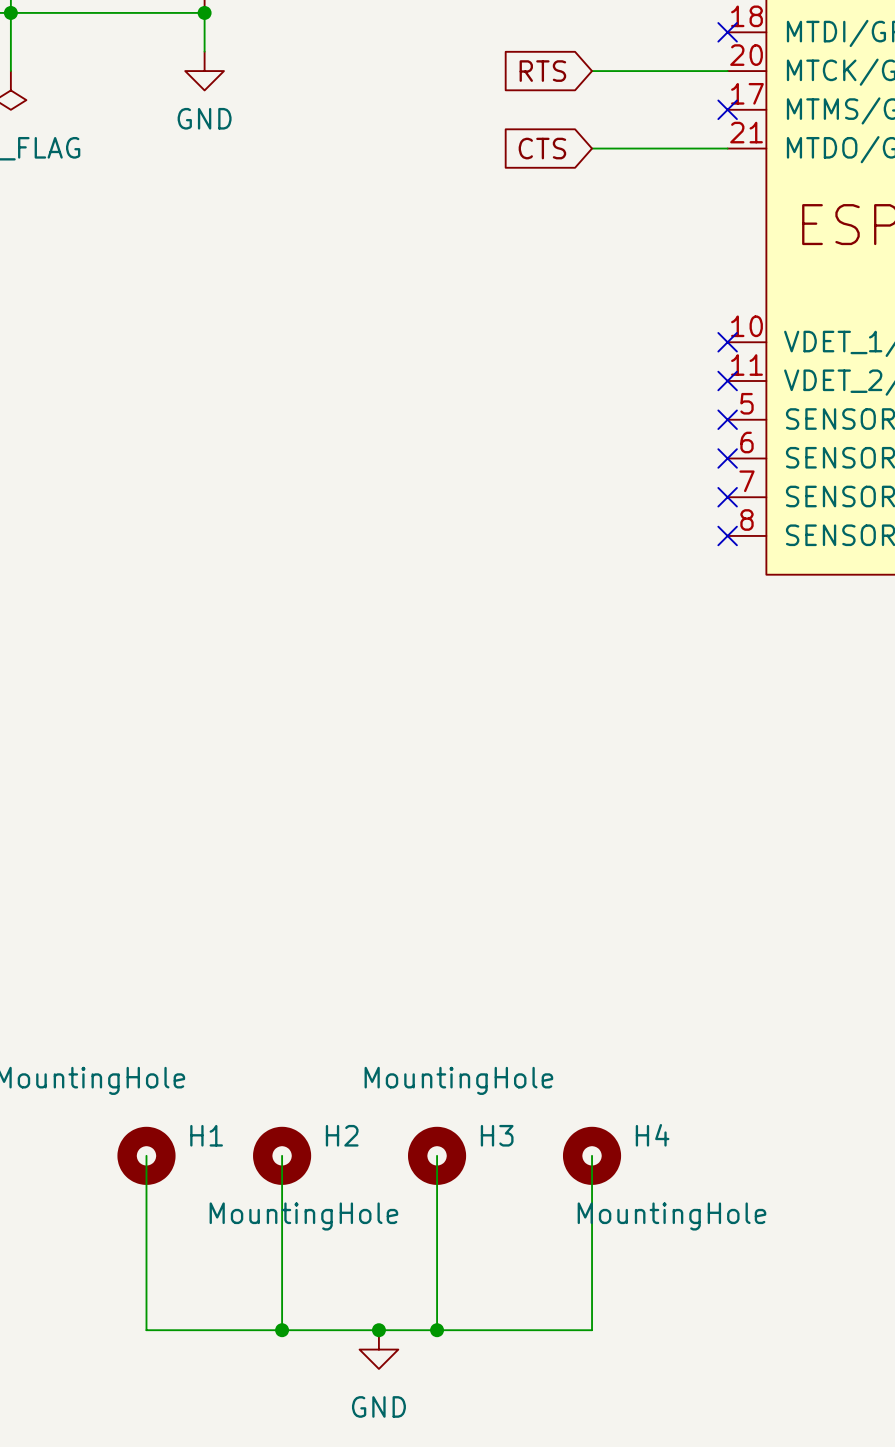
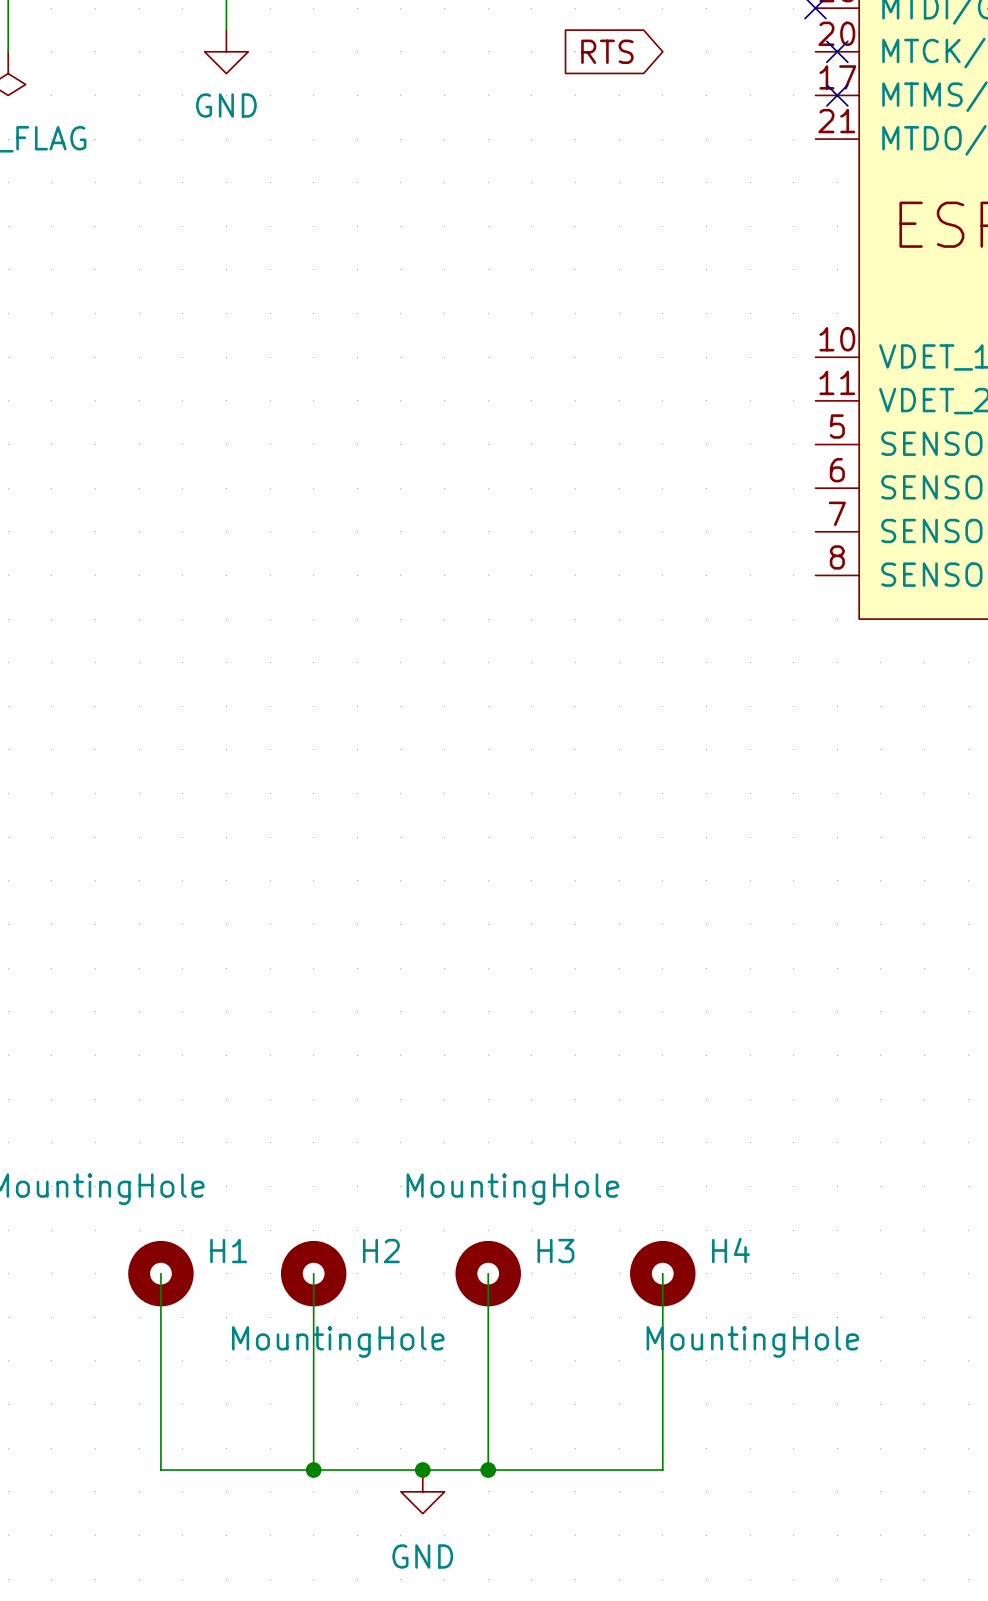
wire: (592, 71) (727, 71) -> none
no-connect mark: none -> (837, 51)
no-connect mark position: (727, 109) -> (837, 95)
global label: CTS (542, 148) -> none
wire: (592, 148) (727, 148) -> none
no-connect mark: (727, 342) -> none
no-connect mark: (727, 381) -> none
no-connect mark: (727, 419) -> none
no-connect mark: (727, 458) -> none
no-connect mark: (727, 497) -> none
no-connect mark: (727, 535) -> none

